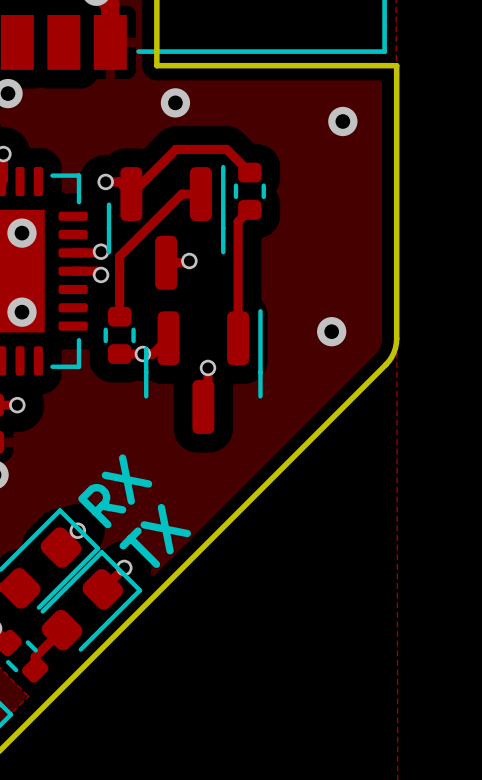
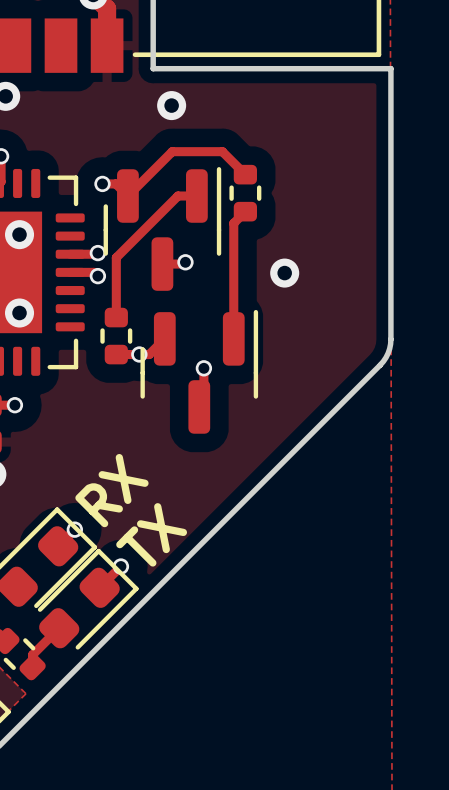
via: (342, 121) -> none
via position: (331, 331) -> (284, 273)

